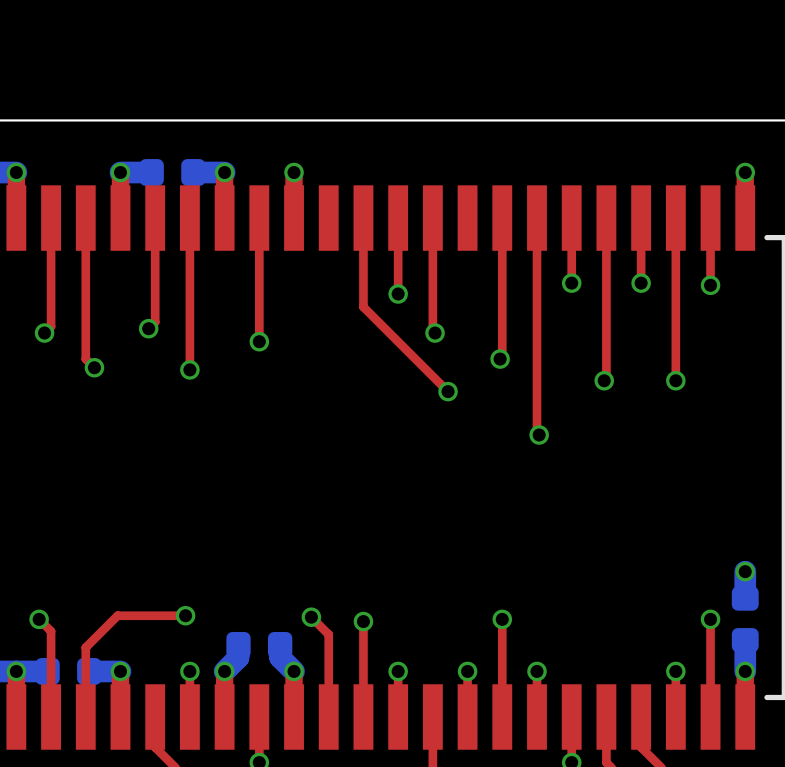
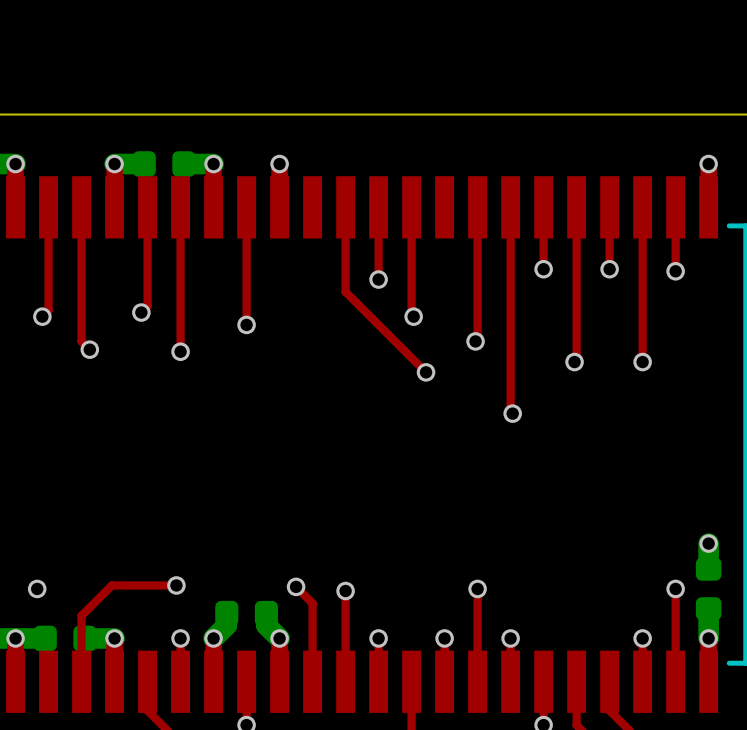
top track: (39, 619) (51, 631) (51, 717) -> none

